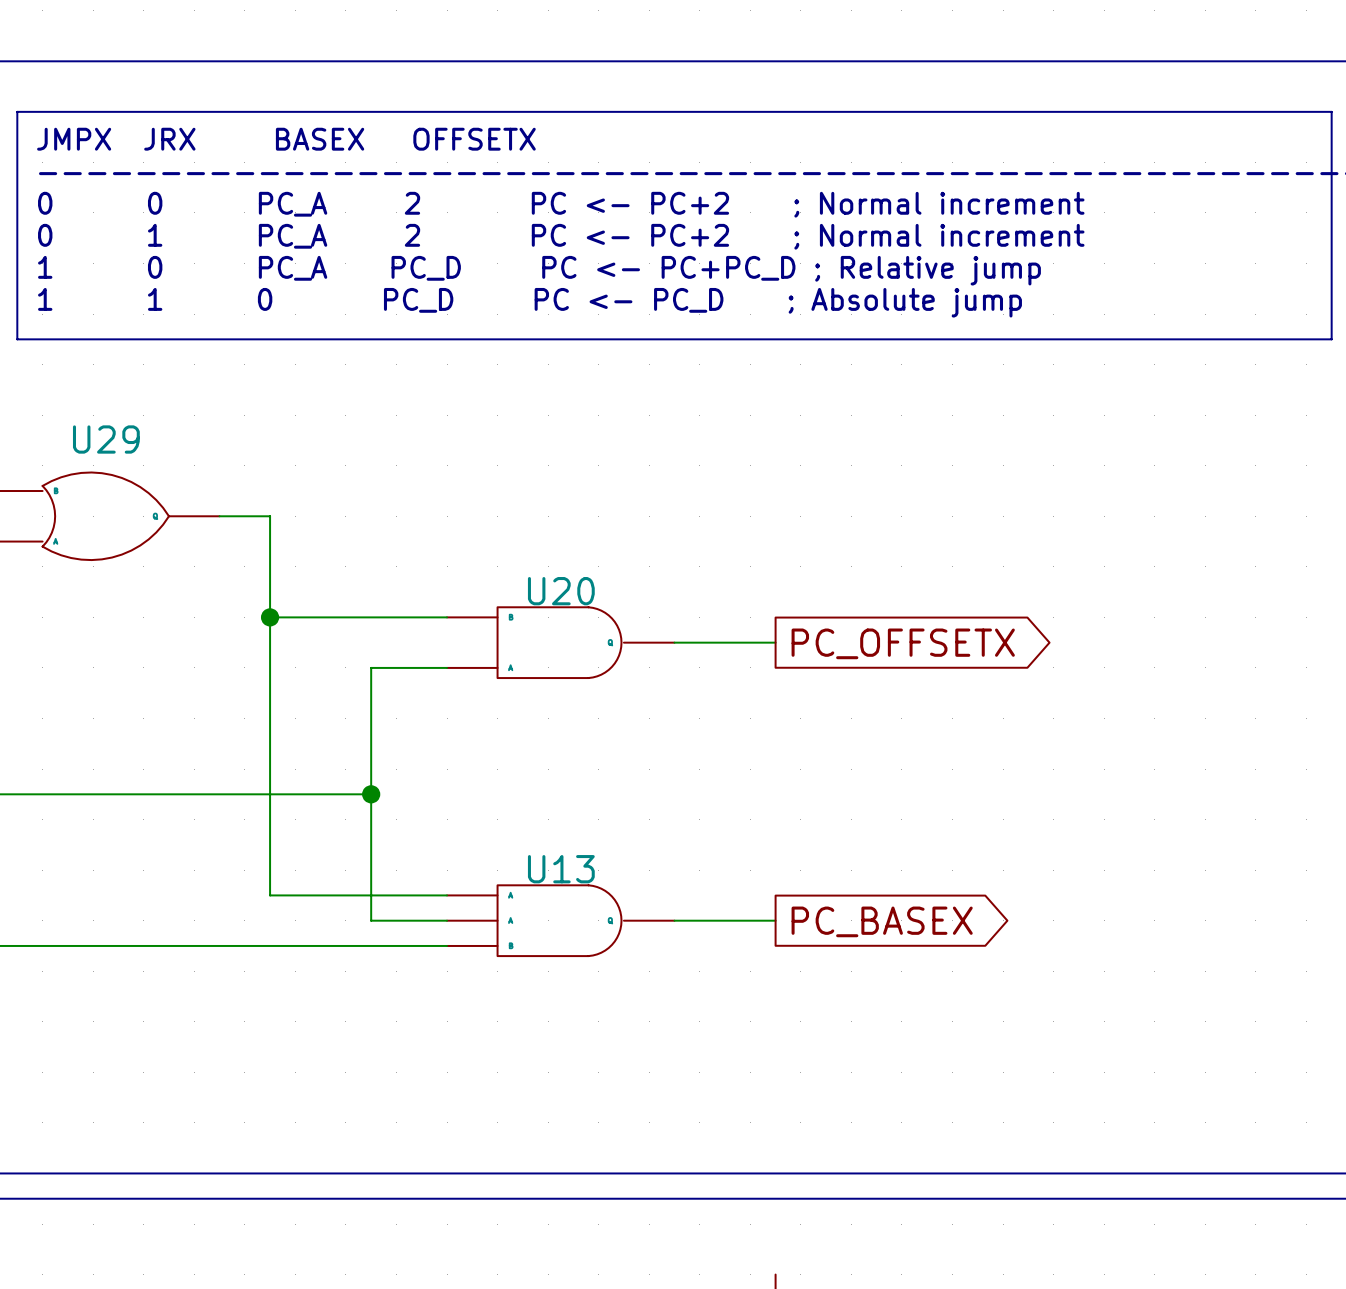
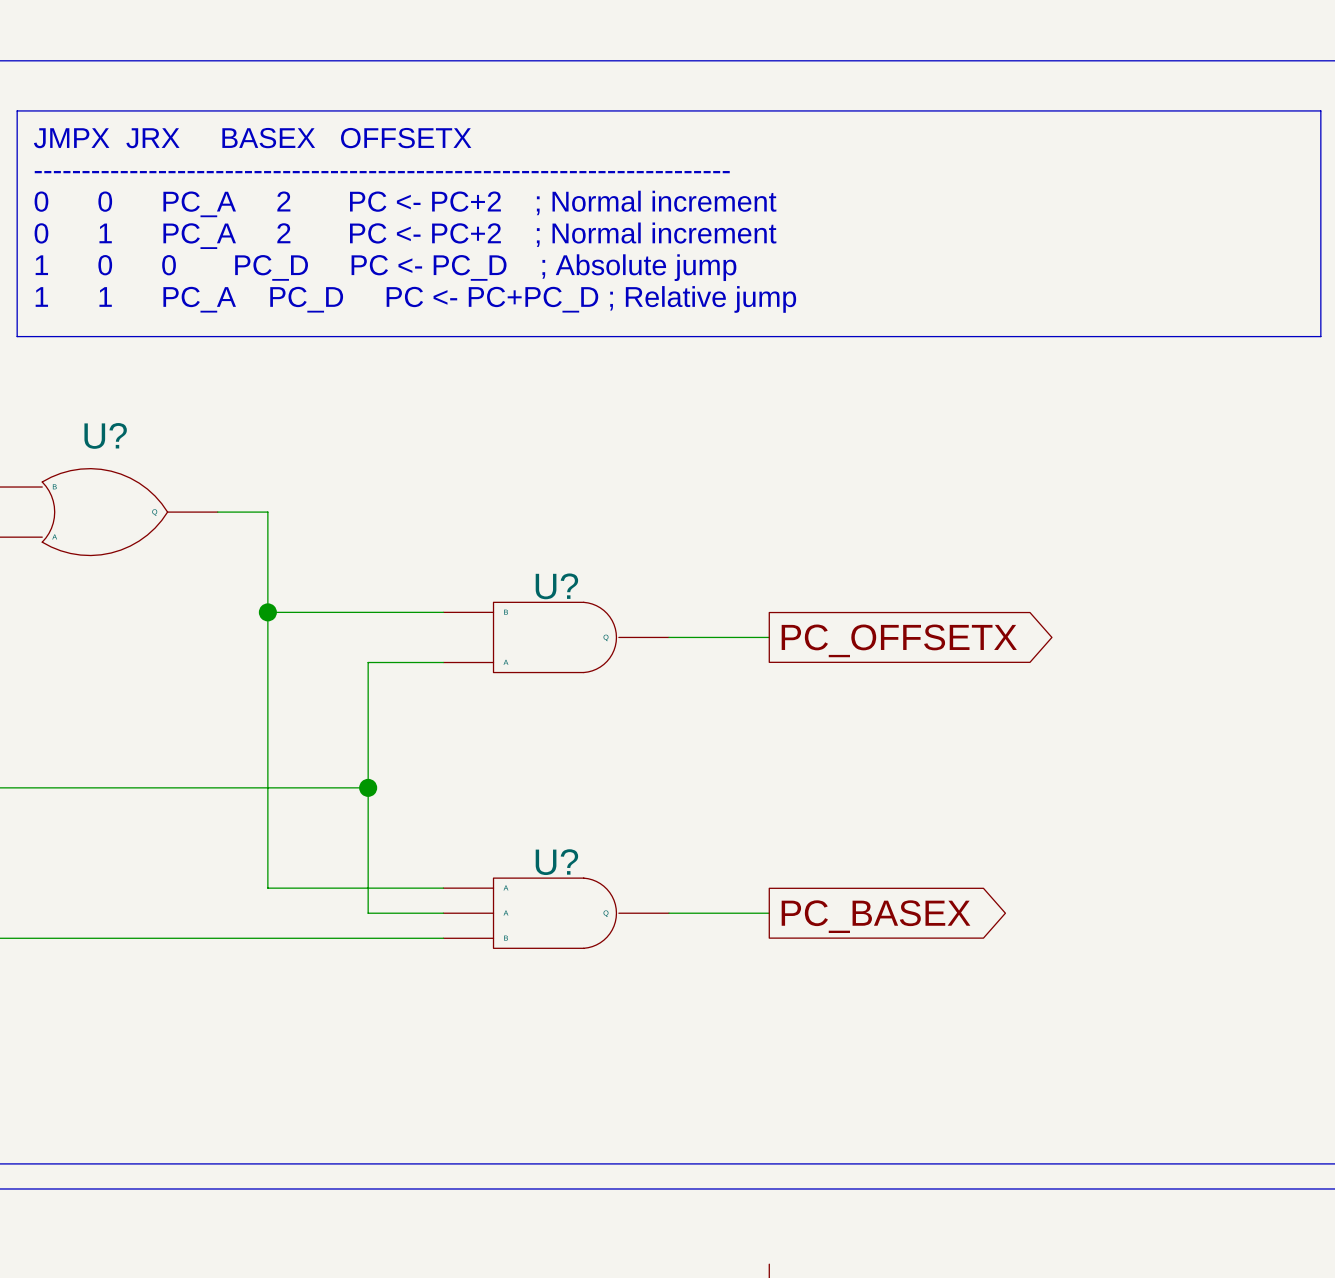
text: 1 0 PC_A PC_D PC <- PC+PC_D ; Relative jump (539, 270) -> 1 0 0 PC_D PC <- PC_D ; Absolute jump (386, 267)
text: 1 1 0 PC_D PC <- PC_D ; Absolute jump (529, 302) -> 1 1 PC_A PC_D PC <- PC+PC_D ; Relative jump (415, 299)
U29 name: U29 (106, 439) -> U? (105, 435)
U20 name: U20 (561, 591) -> U? (556, 586)
U13 name: U13 (561, 869) -> U? (556, 862)

